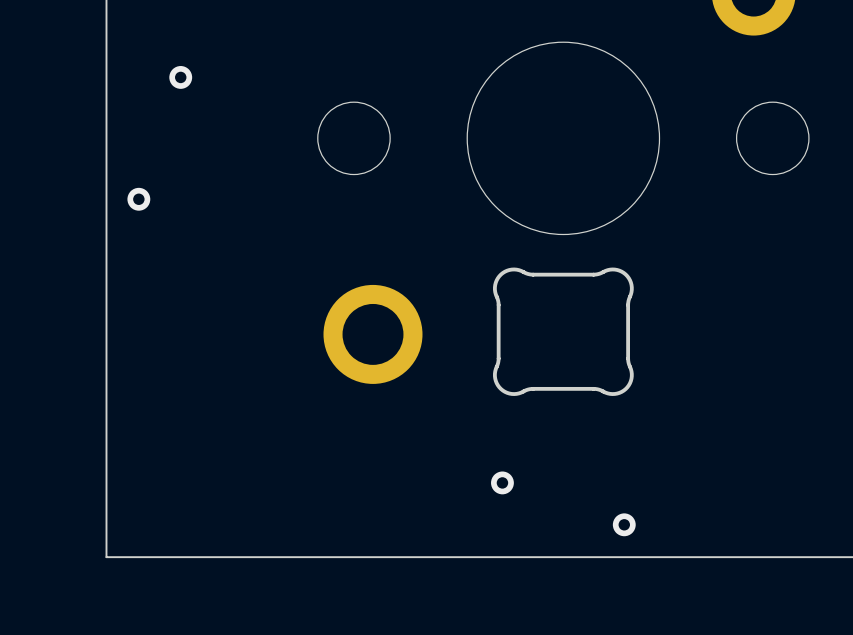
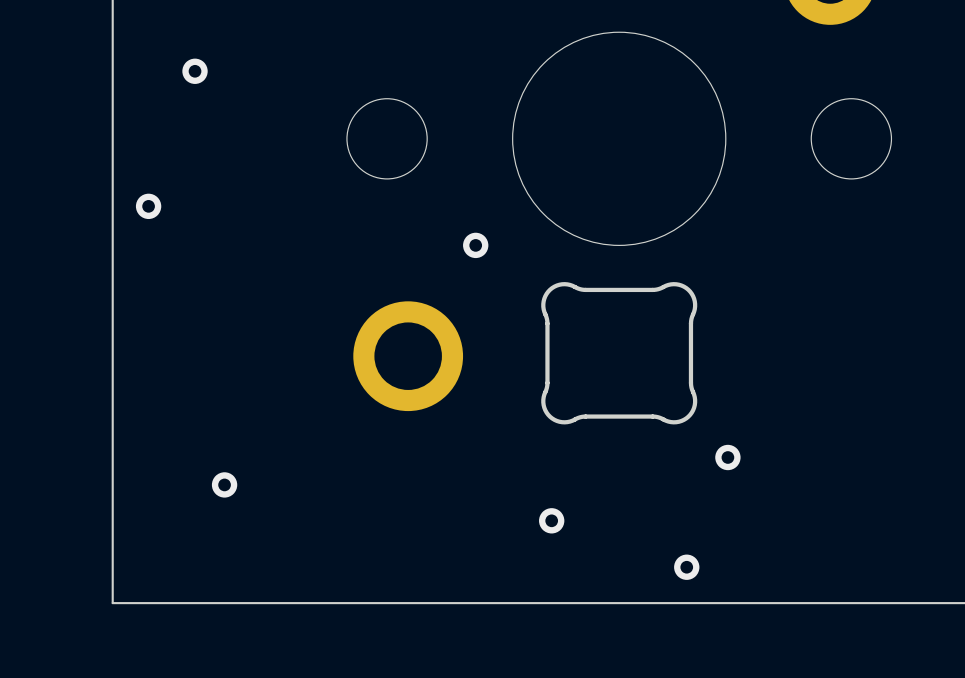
via: none -> (475, 245)
via: none -> (727, 457)
via: none -> (224, 484)

